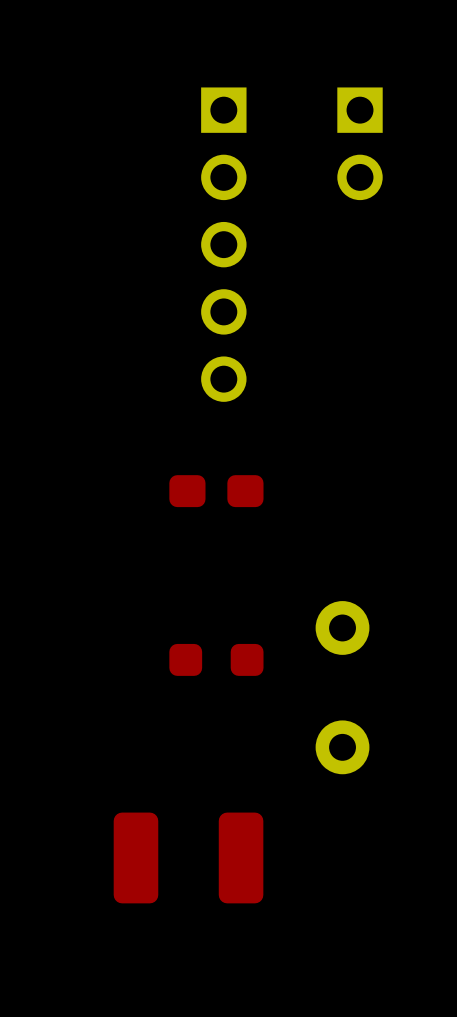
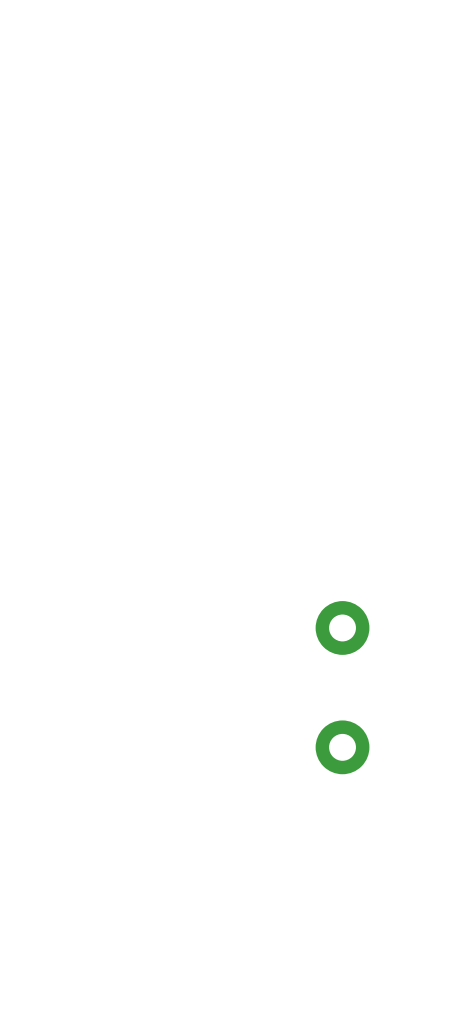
part: (360, 143) -> none
part: (223, 244) -> none
part: (216, 491) -> none
part: (216, 659) -> none
part: (188, 857) -> none

